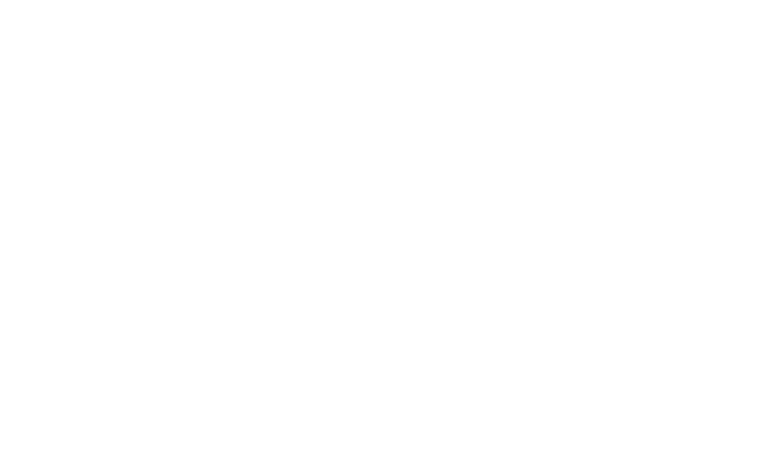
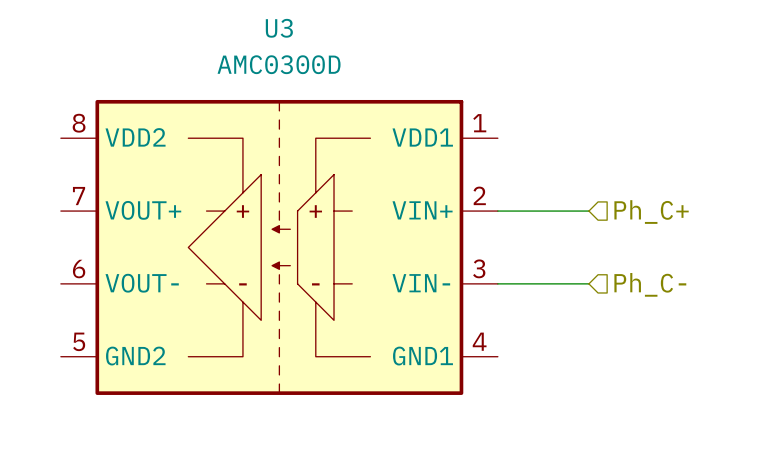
wire: none -> (497, 211) (588, 211)
hierarchical label: none -> Ph_C+ (651, 212)
U3: none -> AMC0300D (279, 247)
wire: none -> (497, 283) (588, 283)
hierarchical label: none -> Ph_C- (650, 284)

